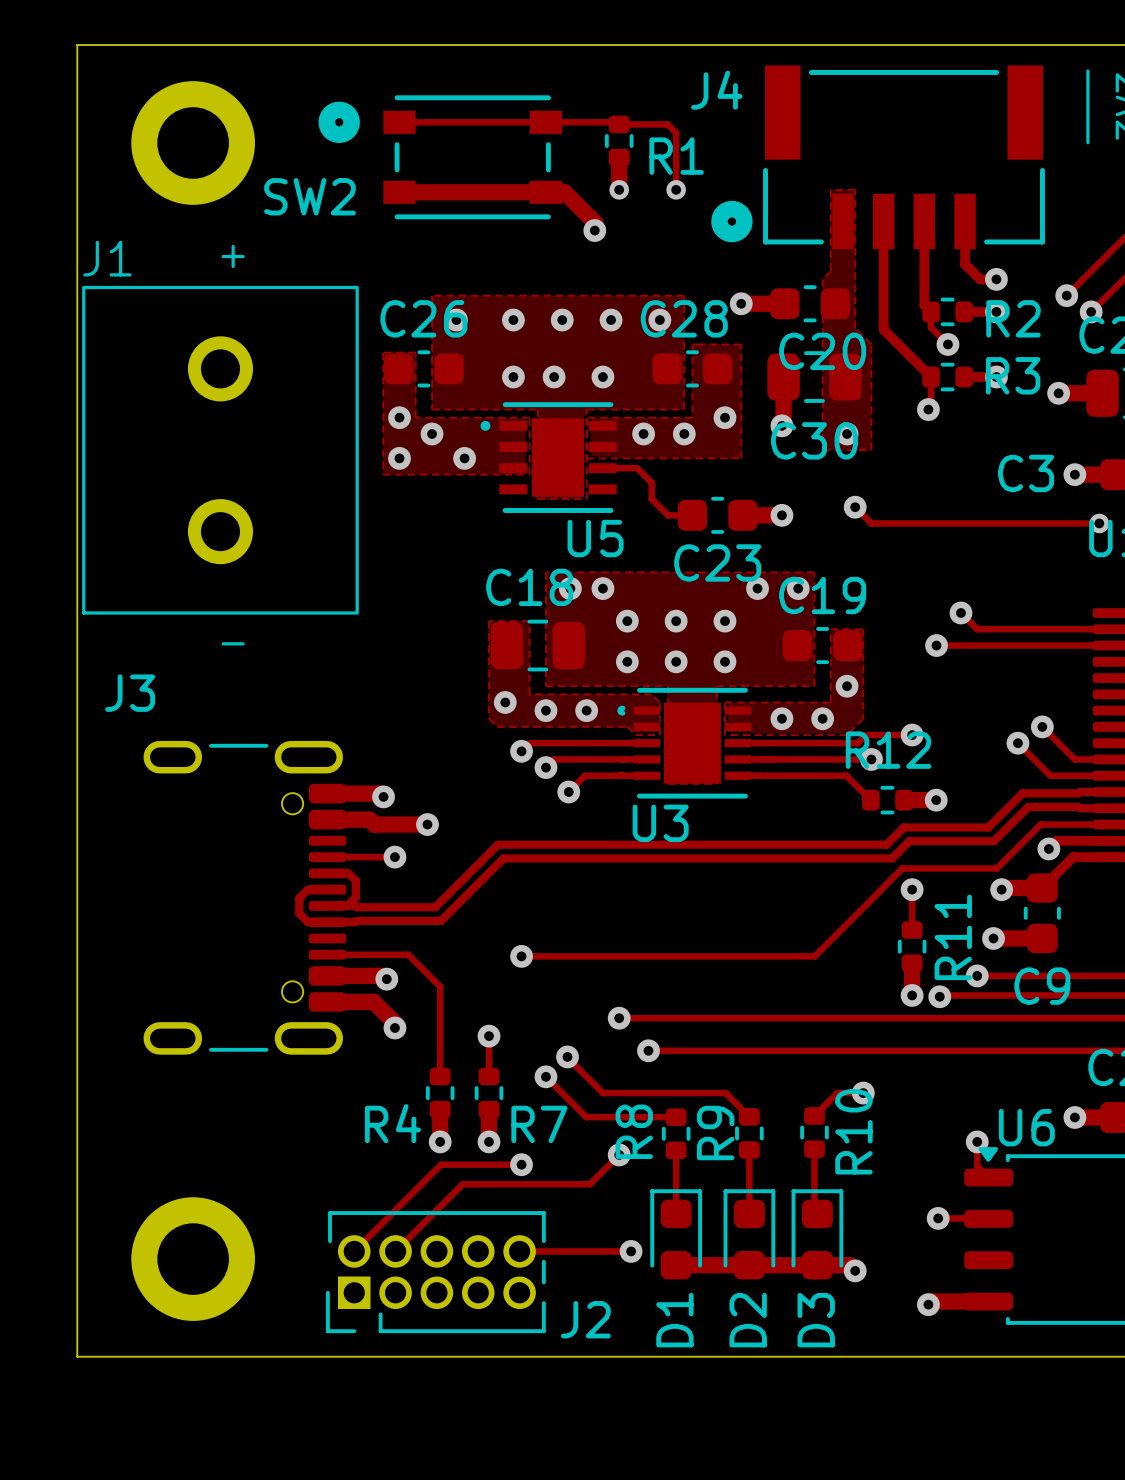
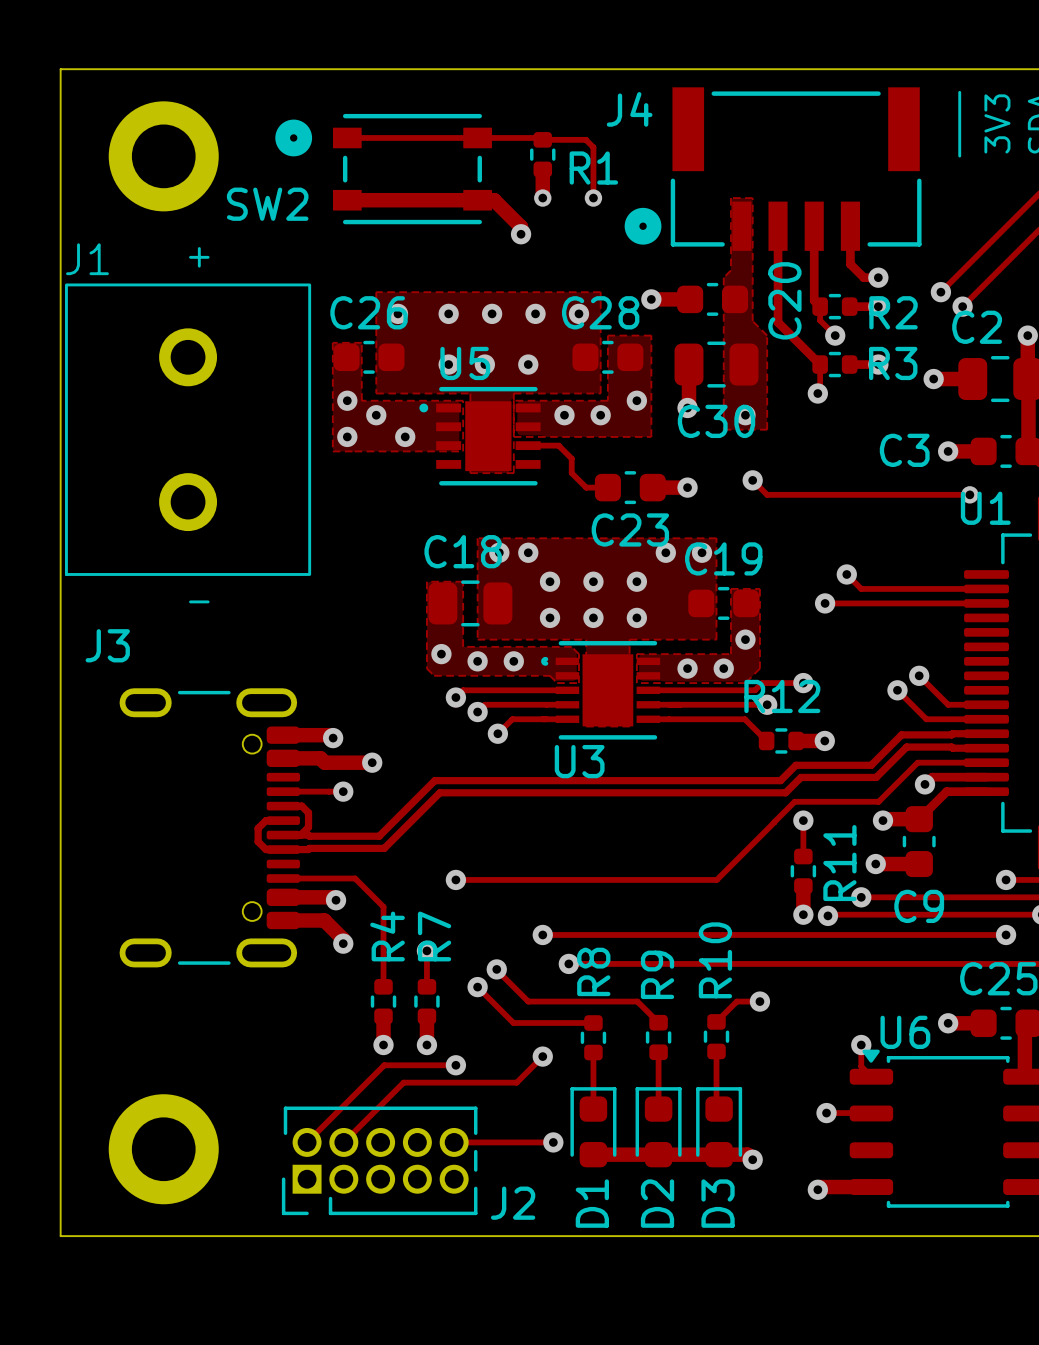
C20 name rotation: 0° (822, 351) -> 90° counterclockwise (784, 300)
U5 name position: U5 (595, 538) -> U5 (465, 363)
R4 name rotation: 0° (392, 1123) -> 90° counterclockwise (387, 936)
R4 name position: R4 (392, 1123) -> R4 (387, 936)
R7 name rotation: 0° (539, 1124) -> 90° counterclockwise (434, 936)
R7 name position: R7 (539, 1124) -> R7 (434, 936)
R8 name position: R8 (634, 1131) -> R8 (593, 971)
R10 name position: R10 (853, 1131) -> R10 (715, 960)
R9 name position: R9 (715, 1133) -> R9 (657, 974)

